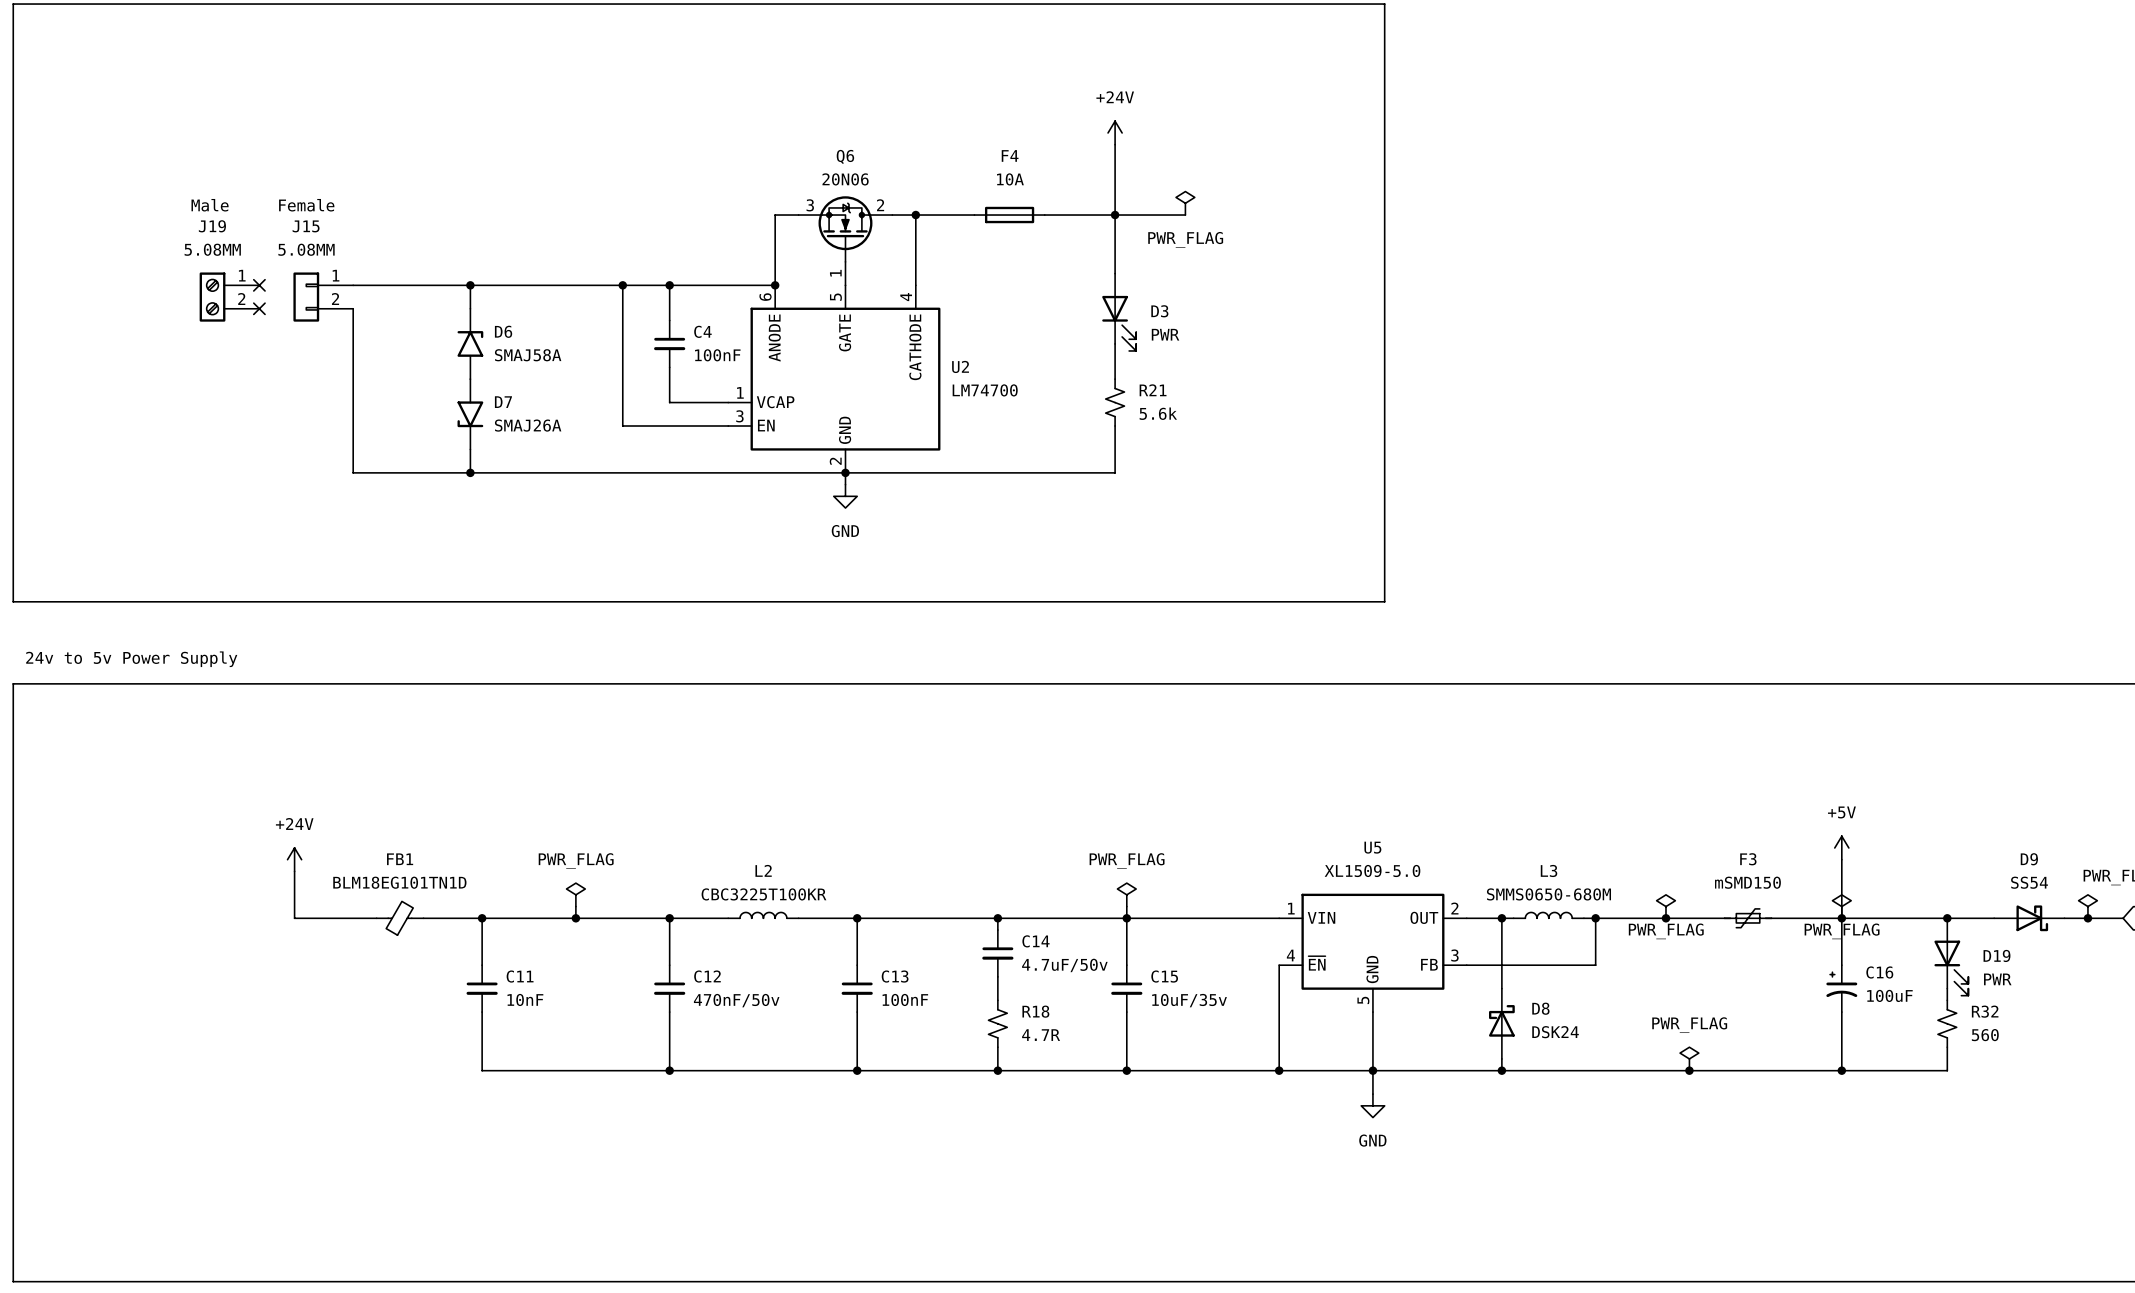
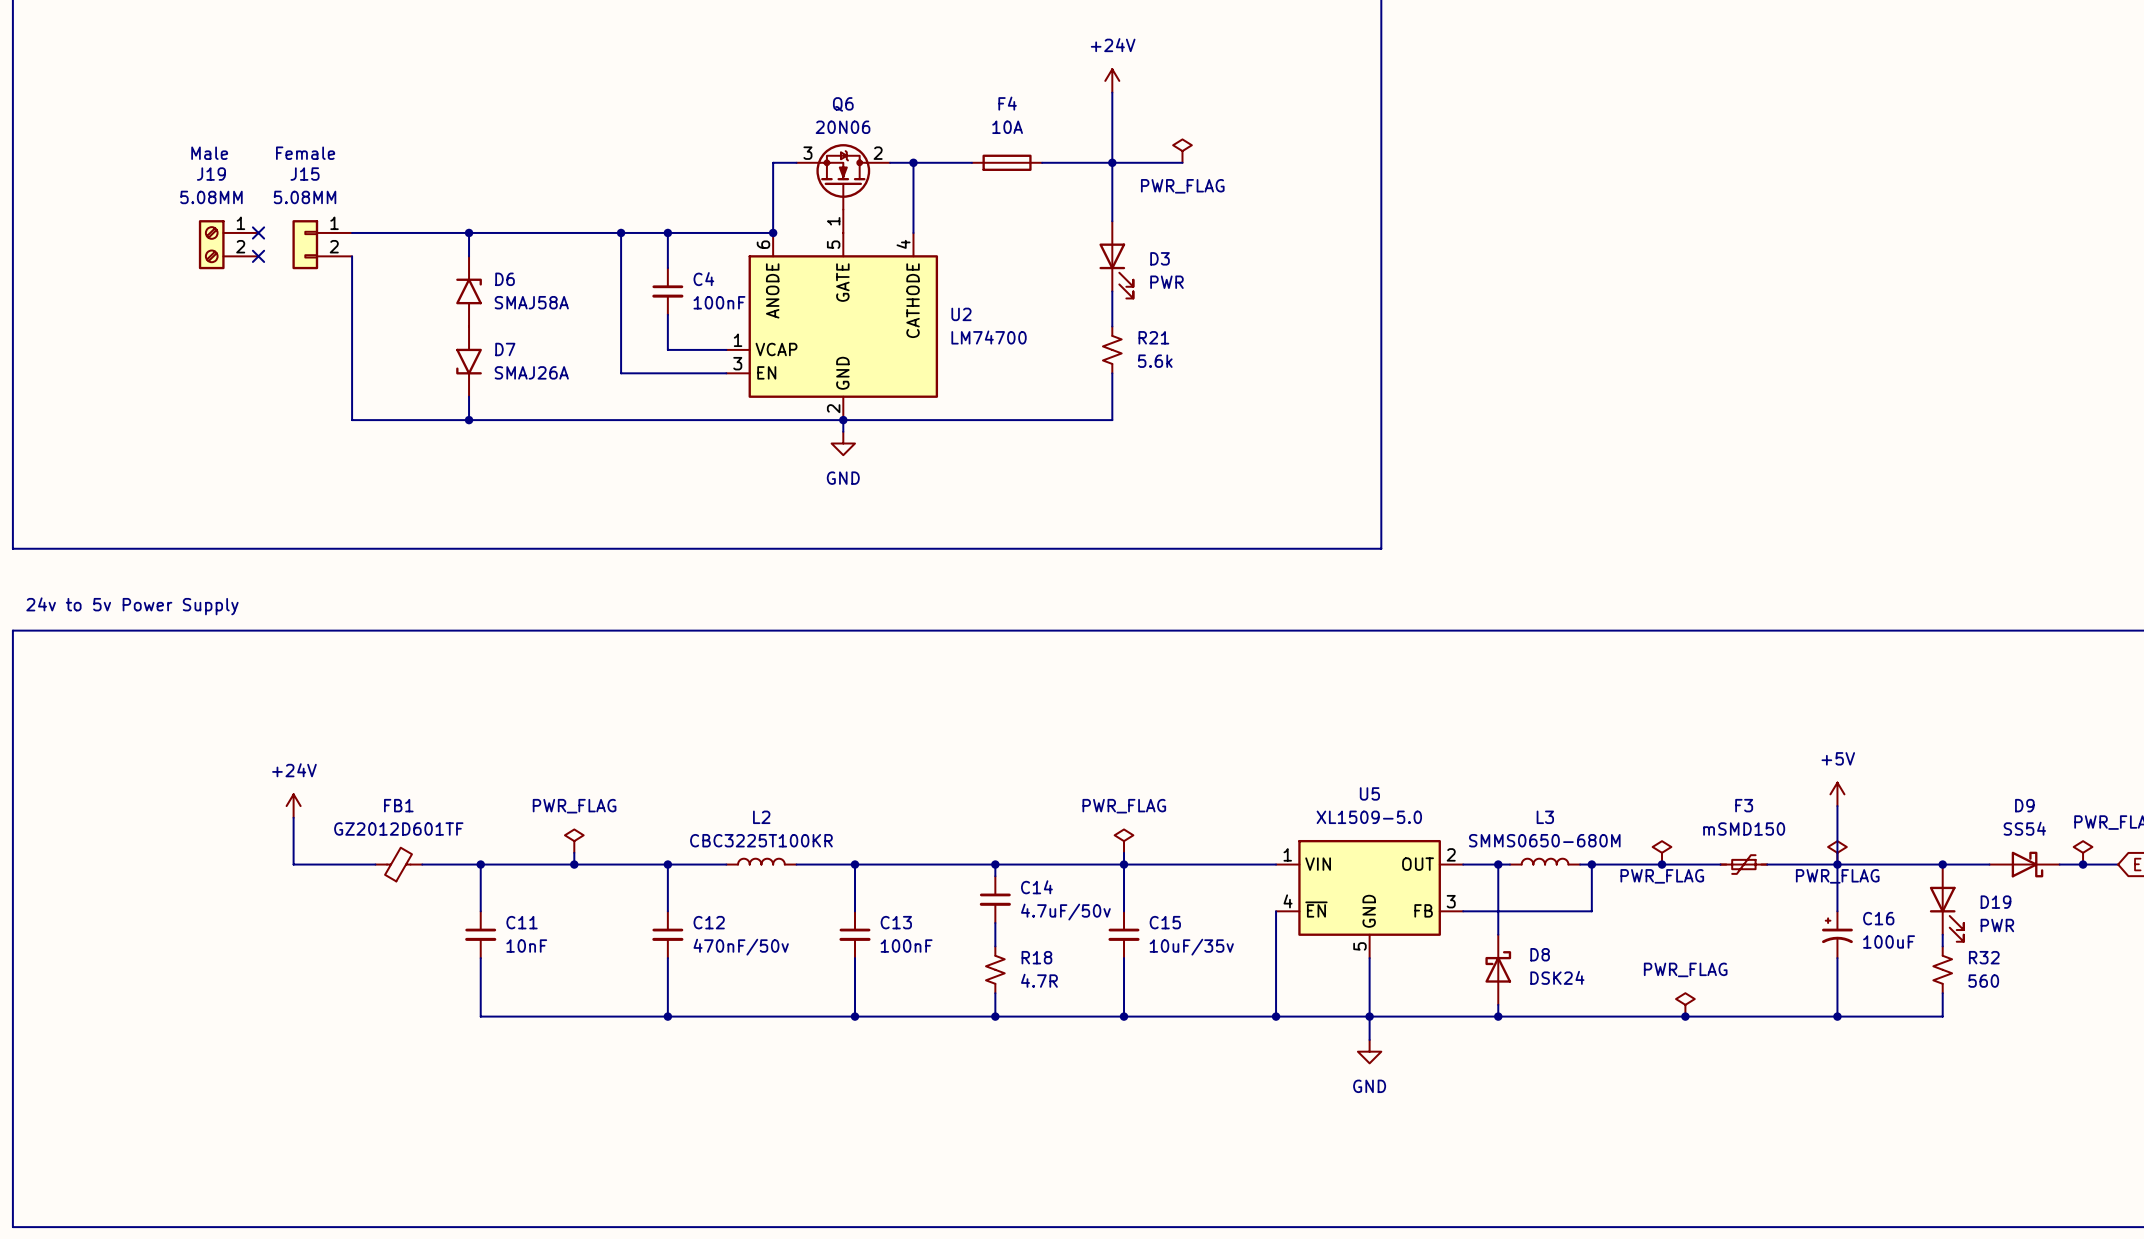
FB1 value: BLM18EG101TN1D (399, 882) -> GZ2012D601TF (398, 829)

